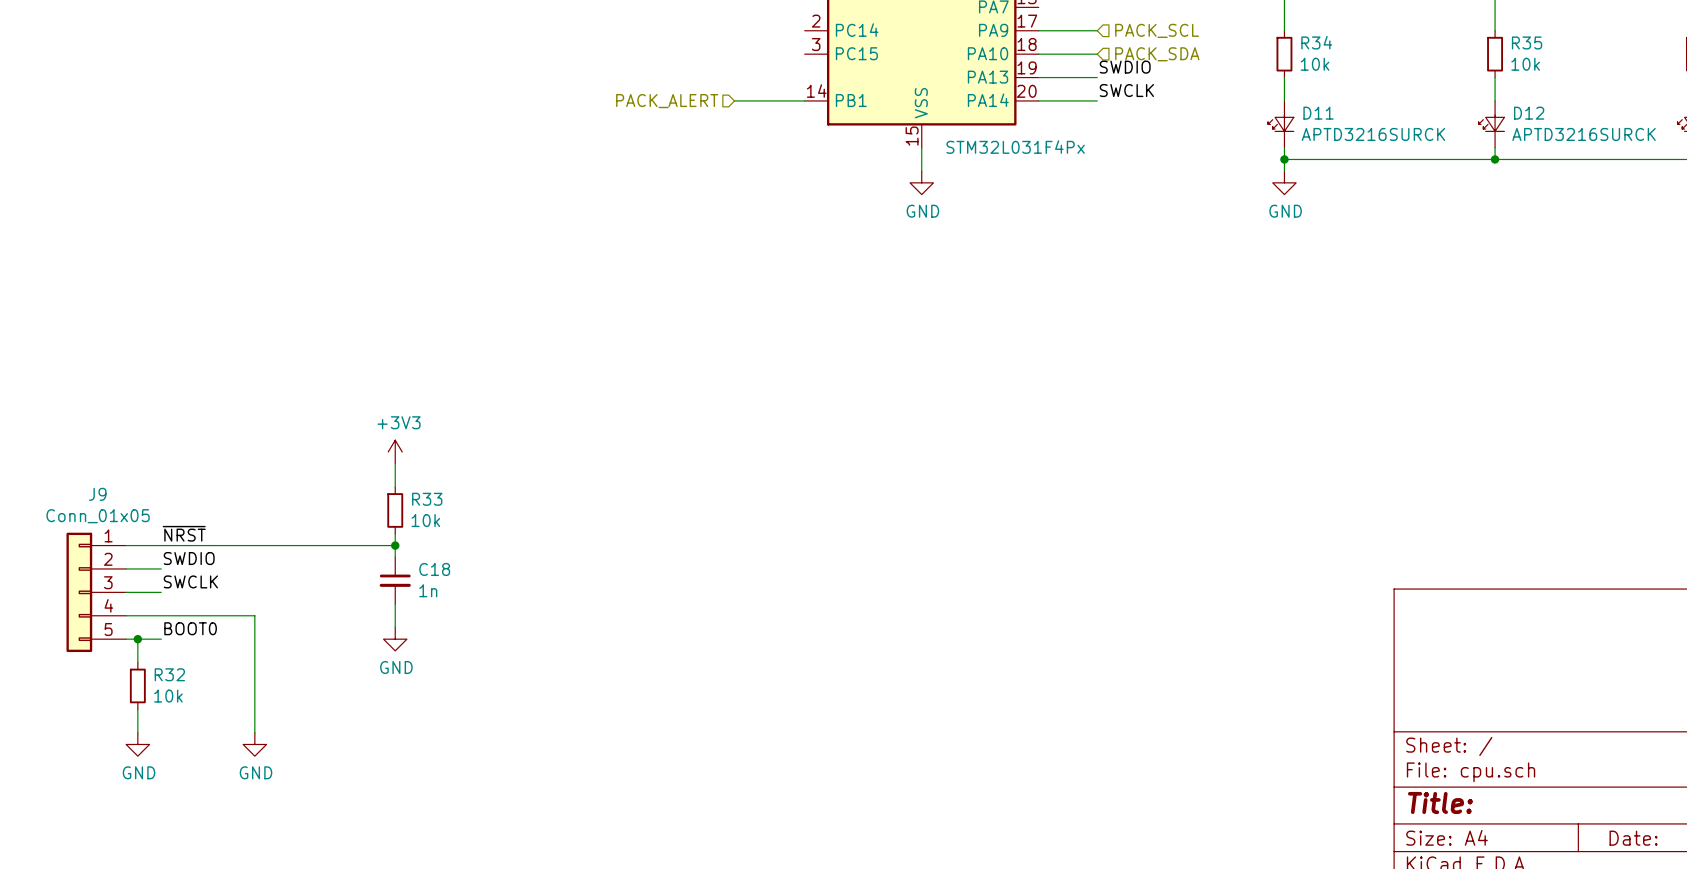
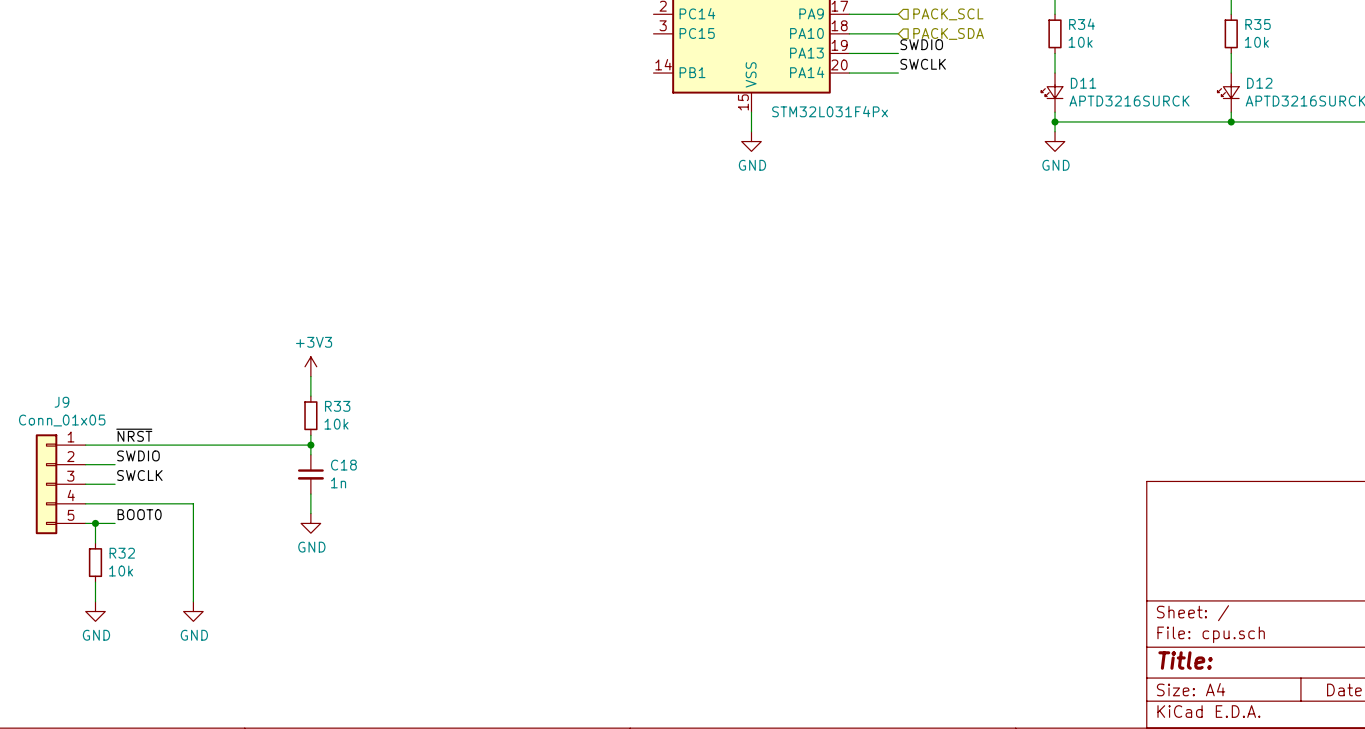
wire: (734, 100) (804, 100) -> none
hierarchical label: PACK_ALERT (667, 101) -> none

